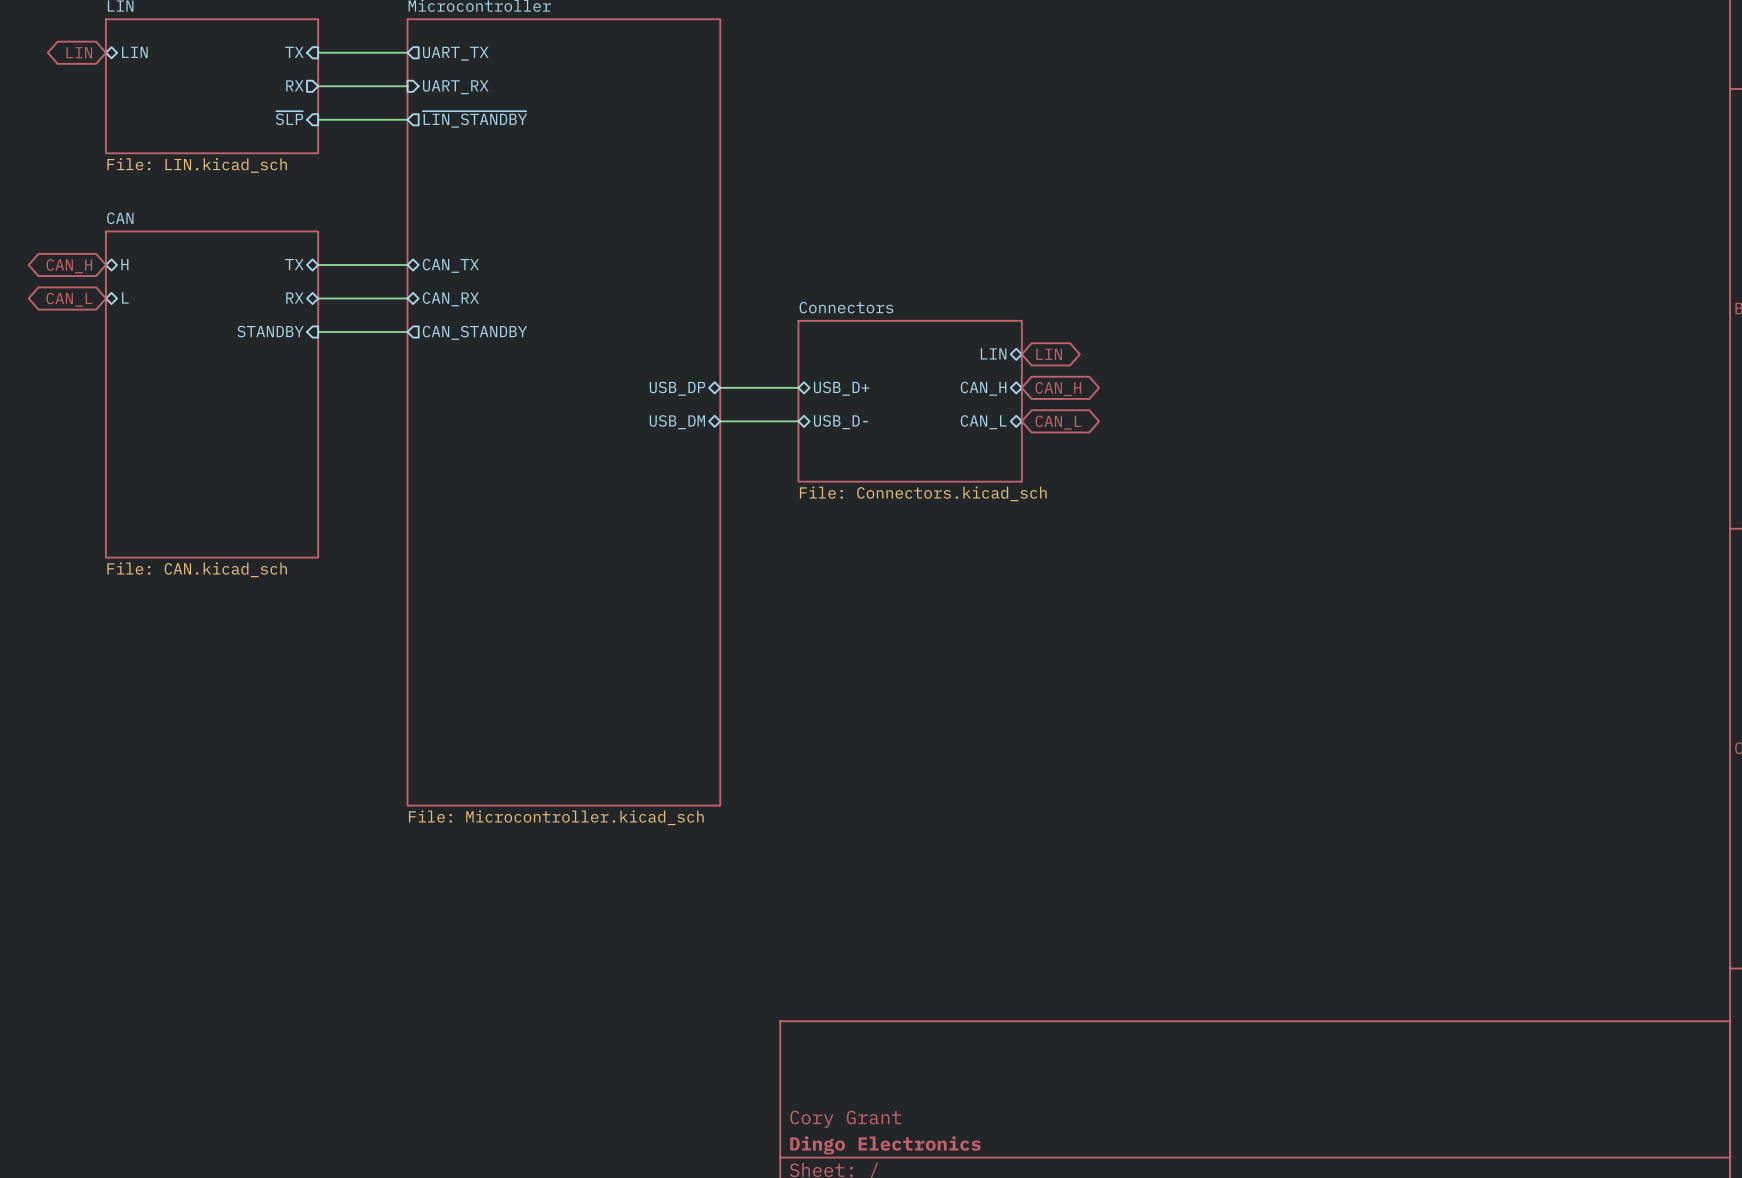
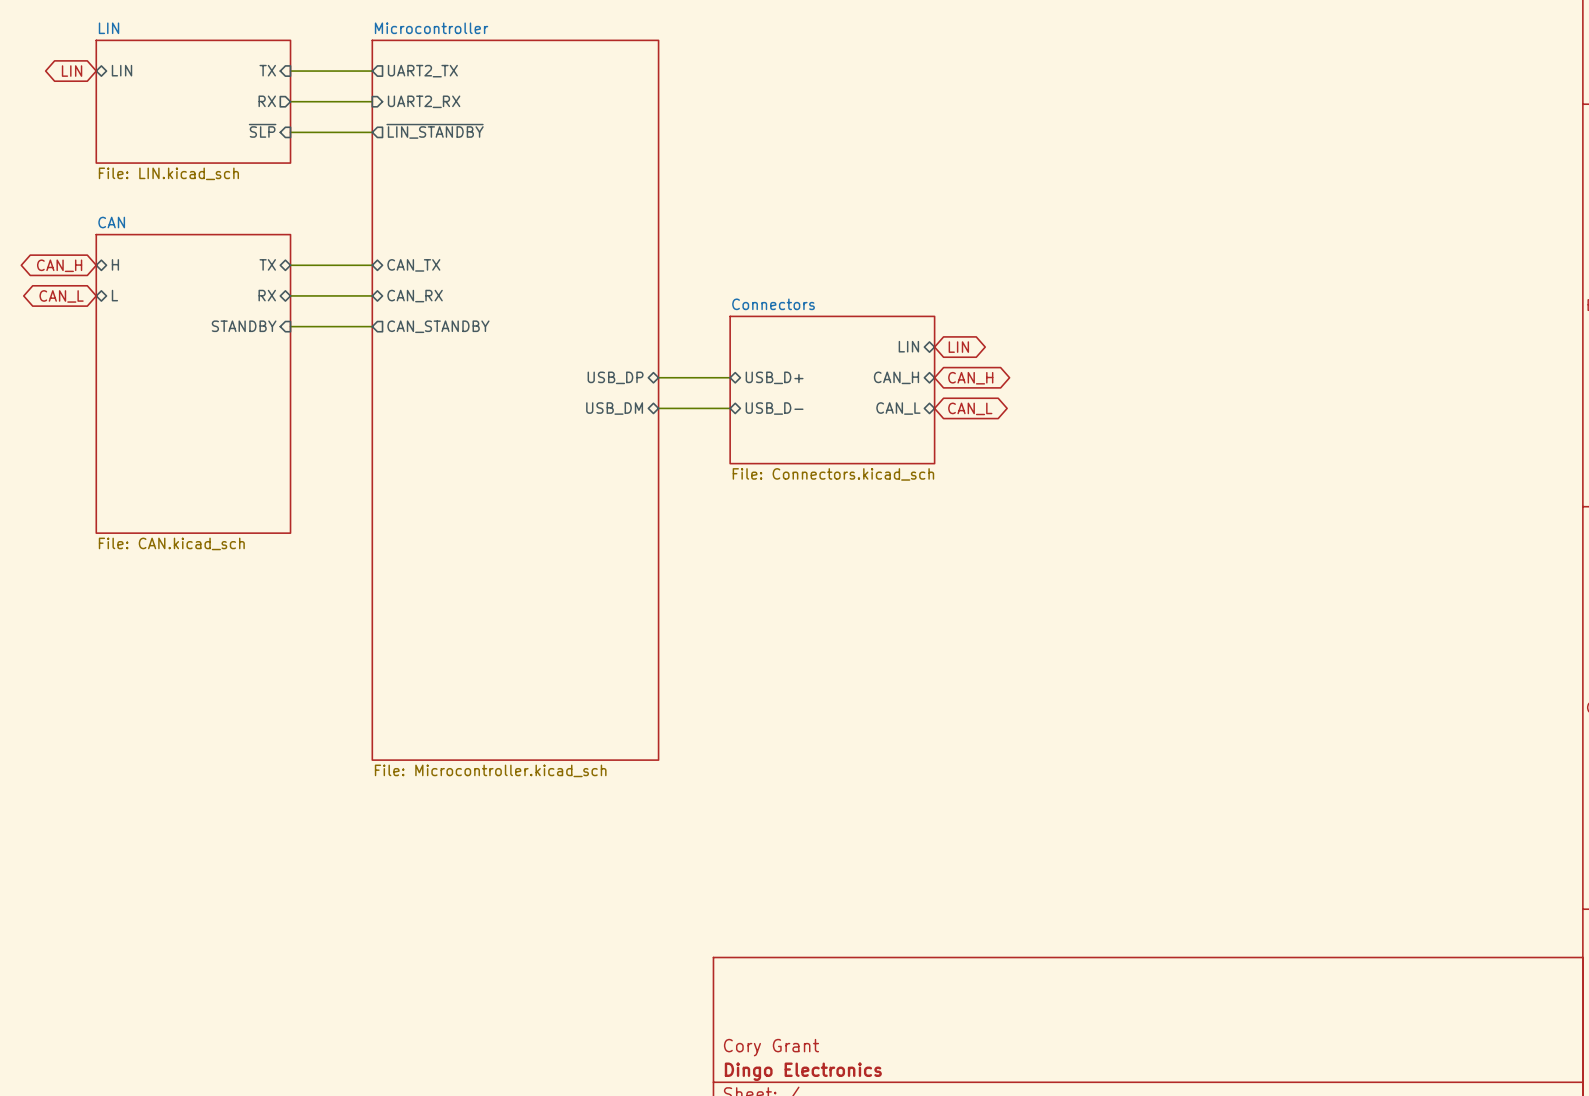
sheet pin: UART_TX (455, 53) -> UART2_TX (422, 71)
sheet pin: UART_RX (455, 87) -> UART2_RX (424, 101)

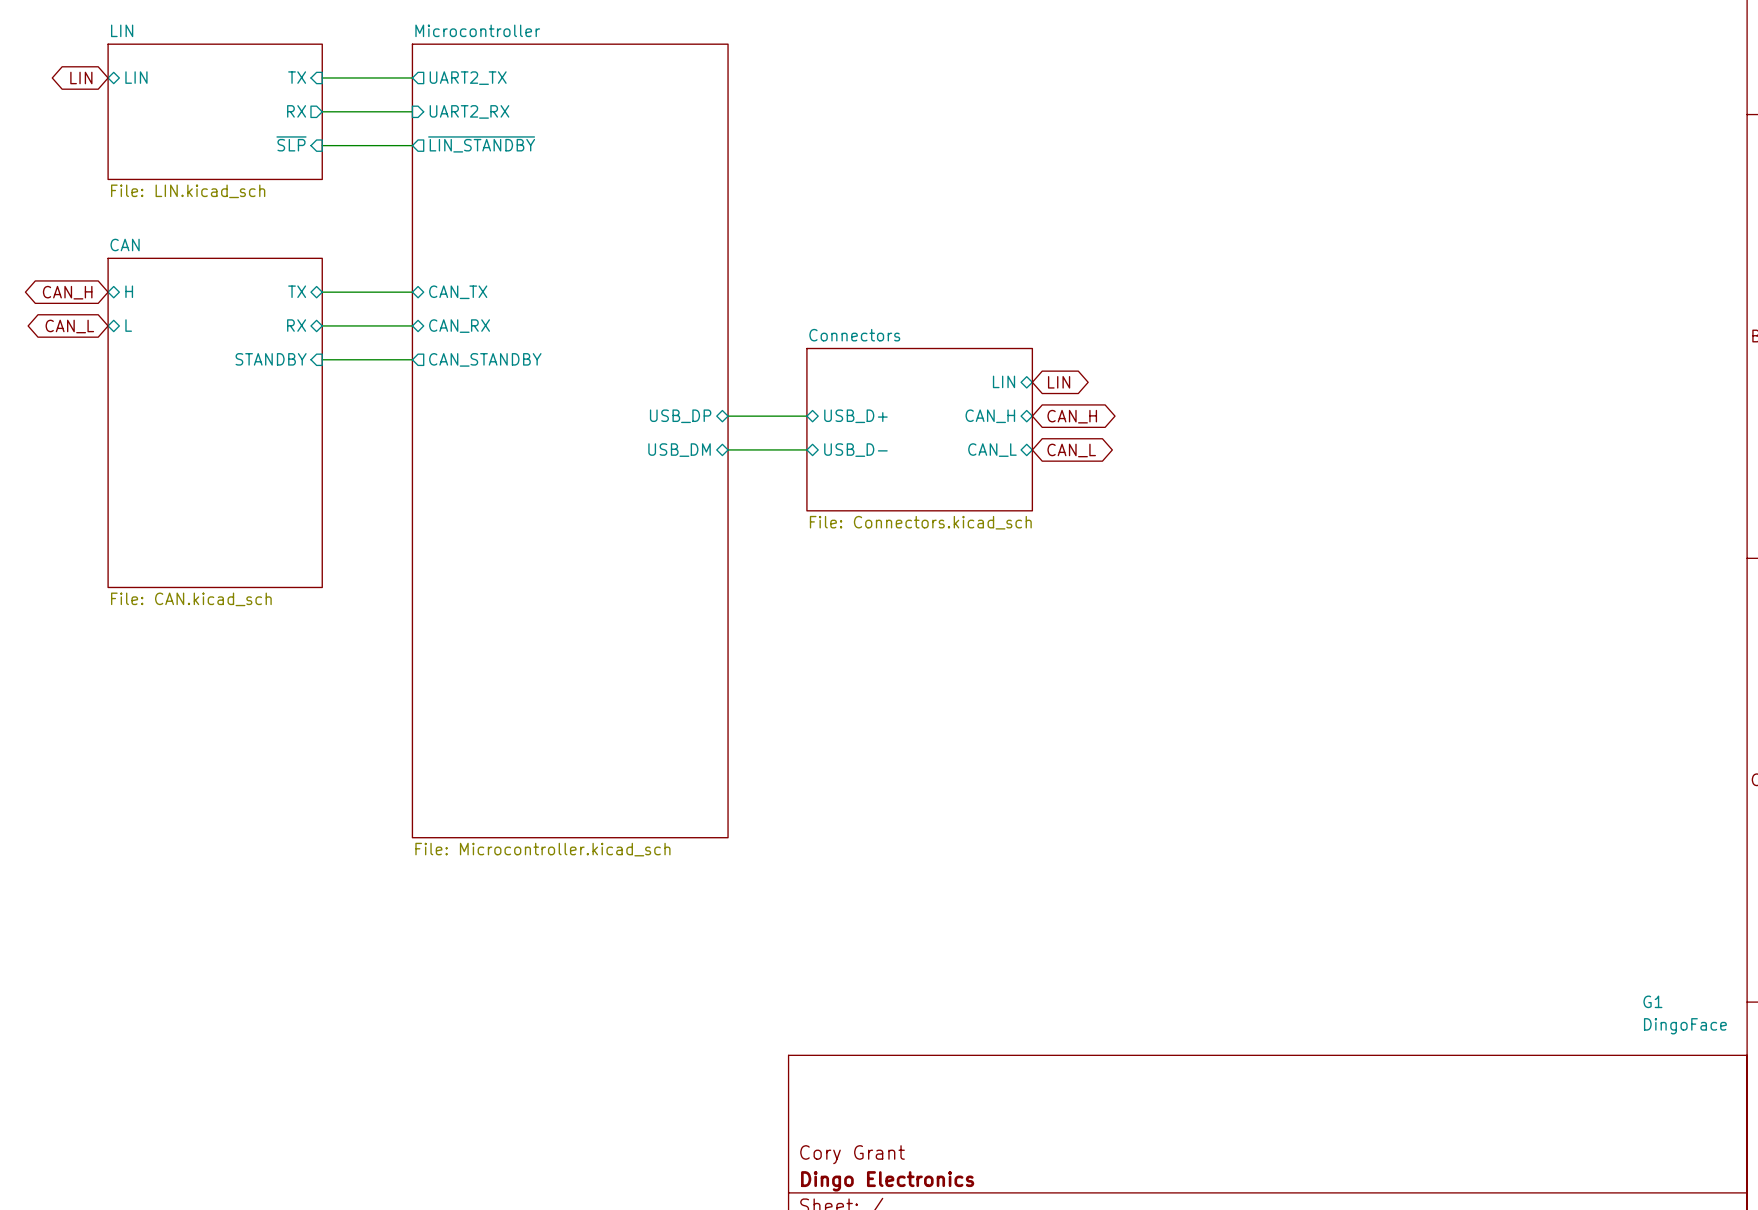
G1: none -> DingoFace (1685, 1014)

